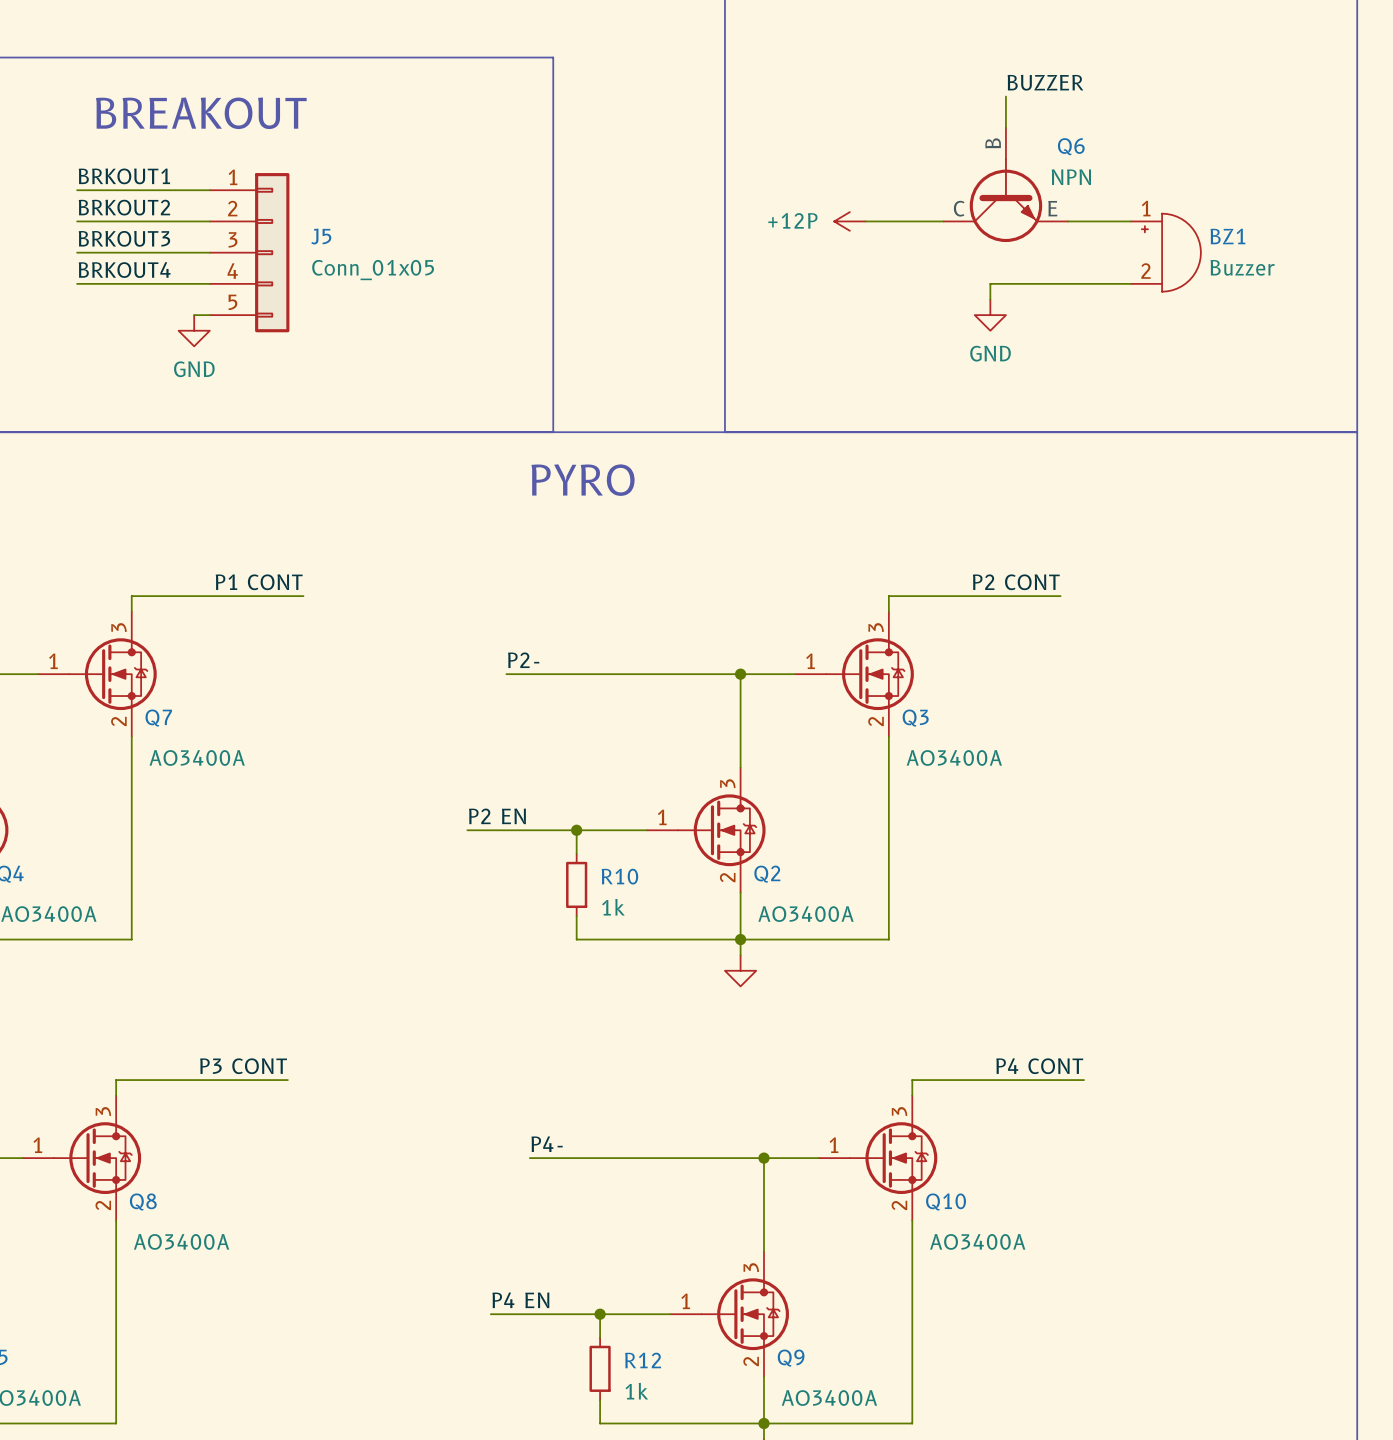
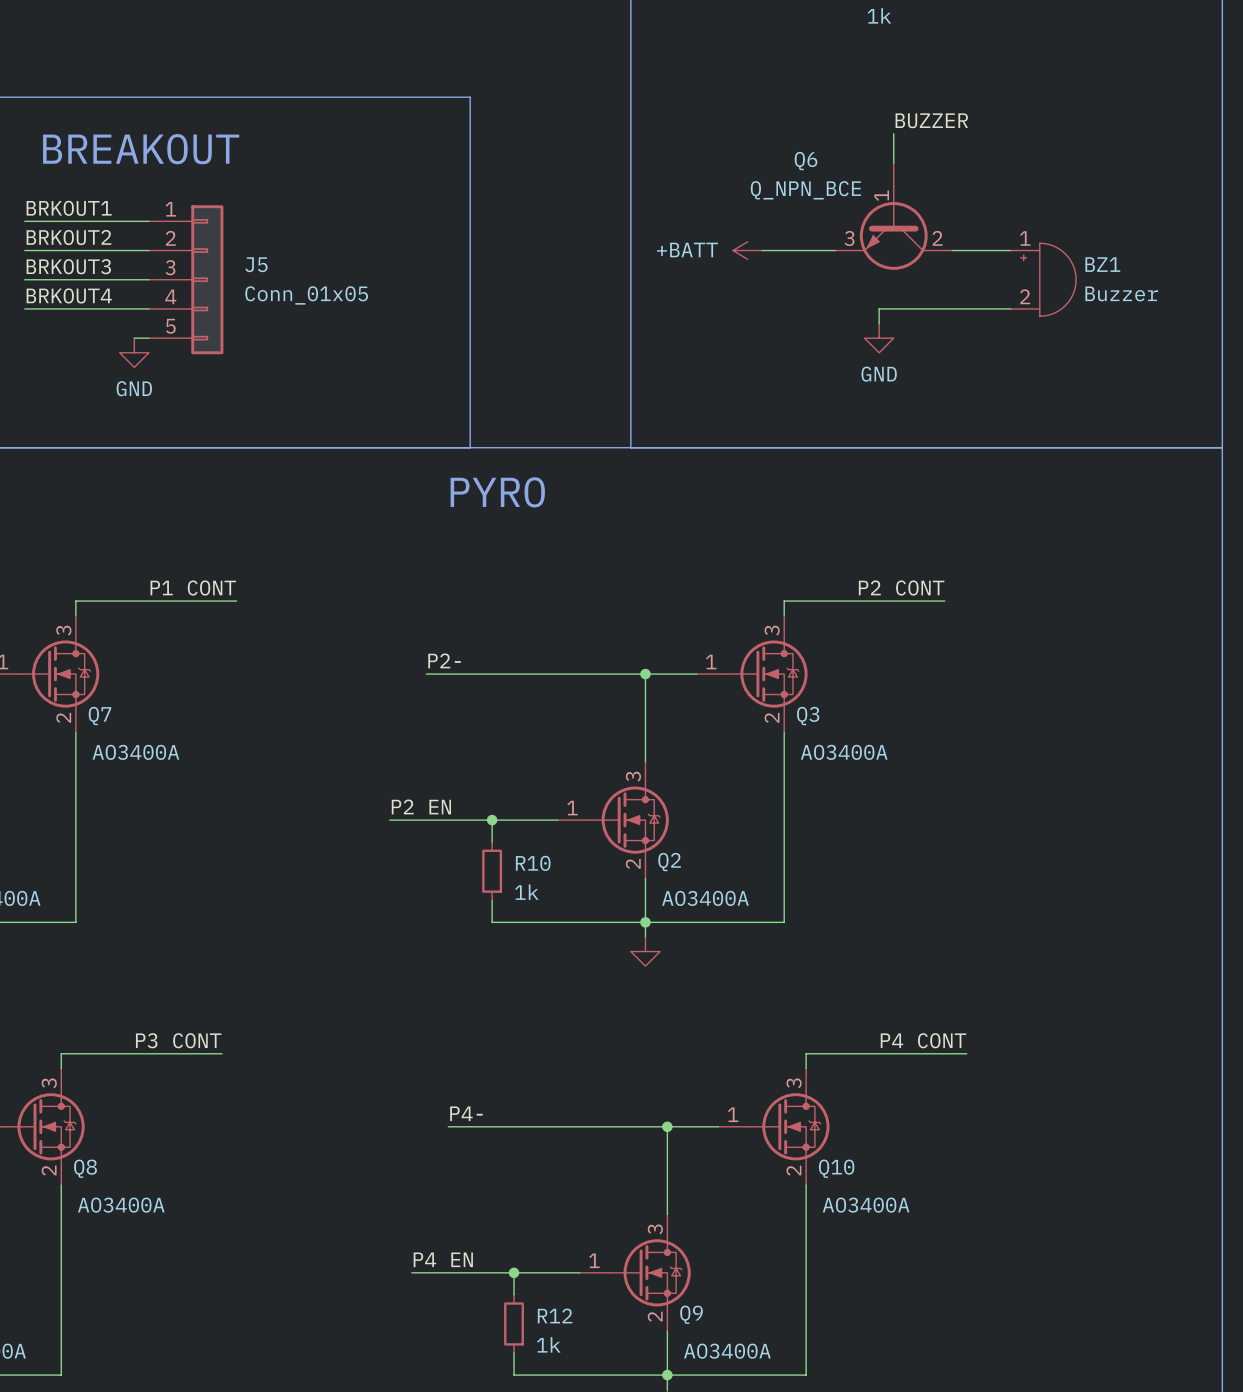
Q6 symbol: [943, 127, 1069, 243] -> [835, 162, 953, 270]
Q6 name position: Q6 (1071, 146) -> Q6 (806, 161)
Q6 value: NPN (1071, 177) -> Q_NPN_BCE (805, 190)
power symbol: +12P (849, 221) -> +BATT (747, 250)

